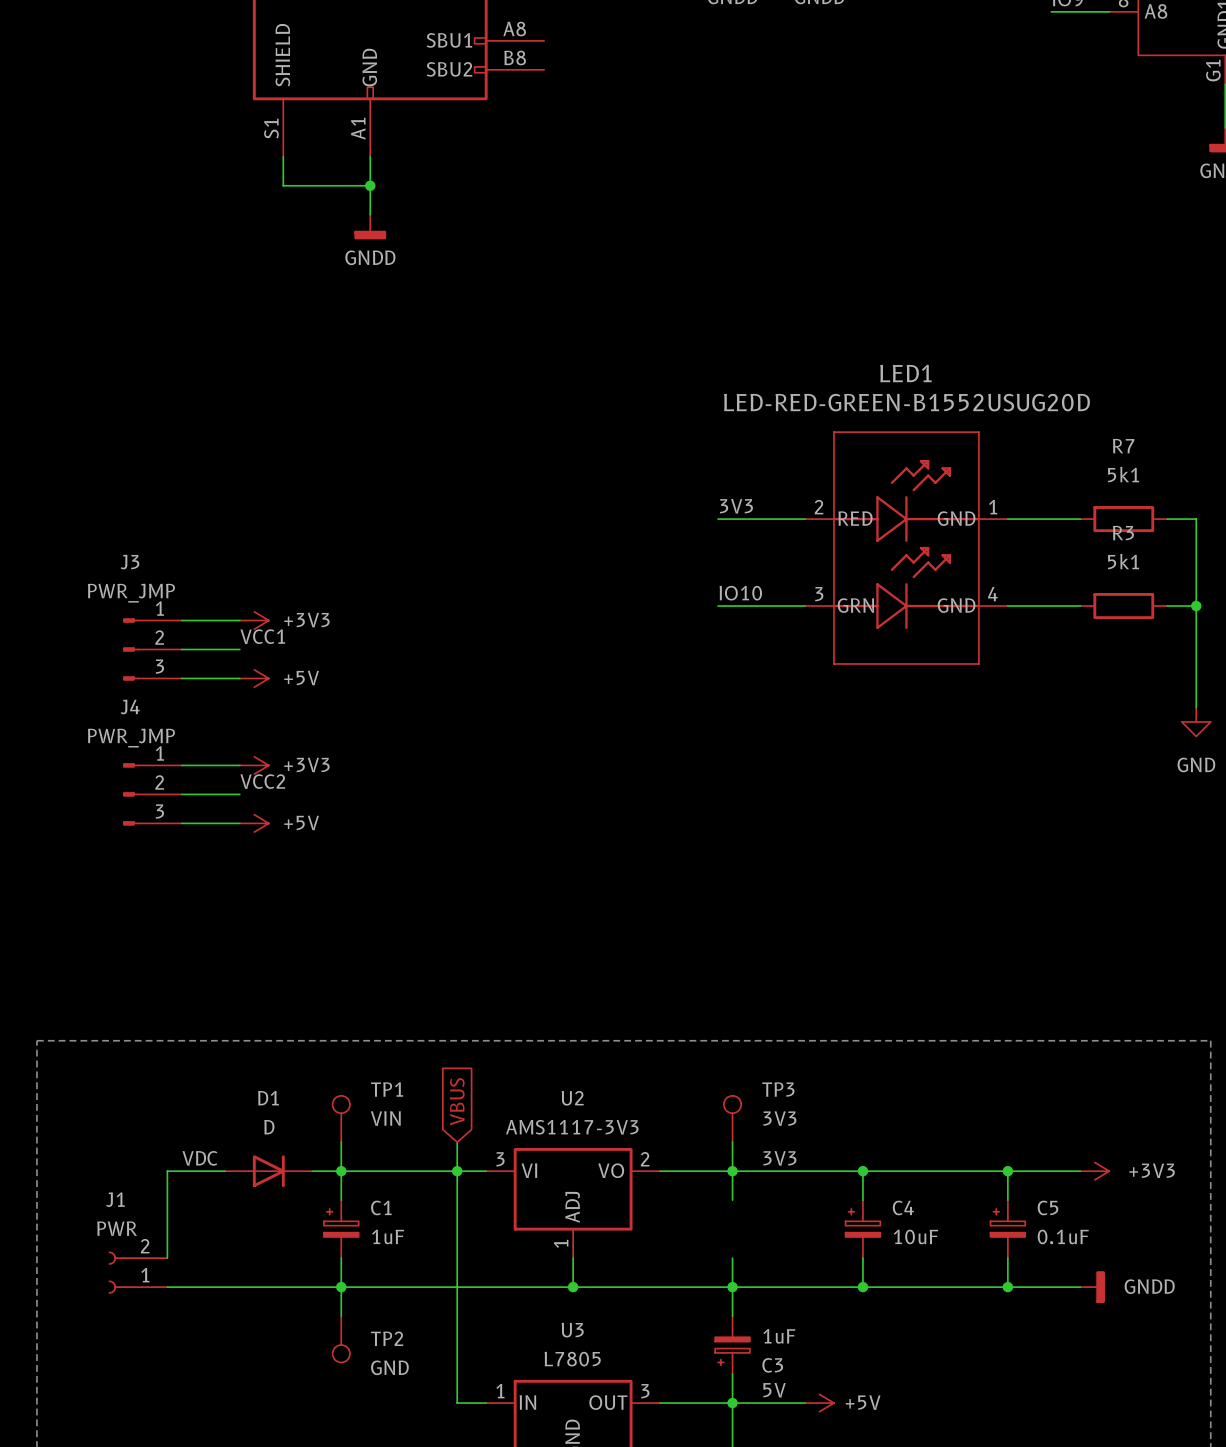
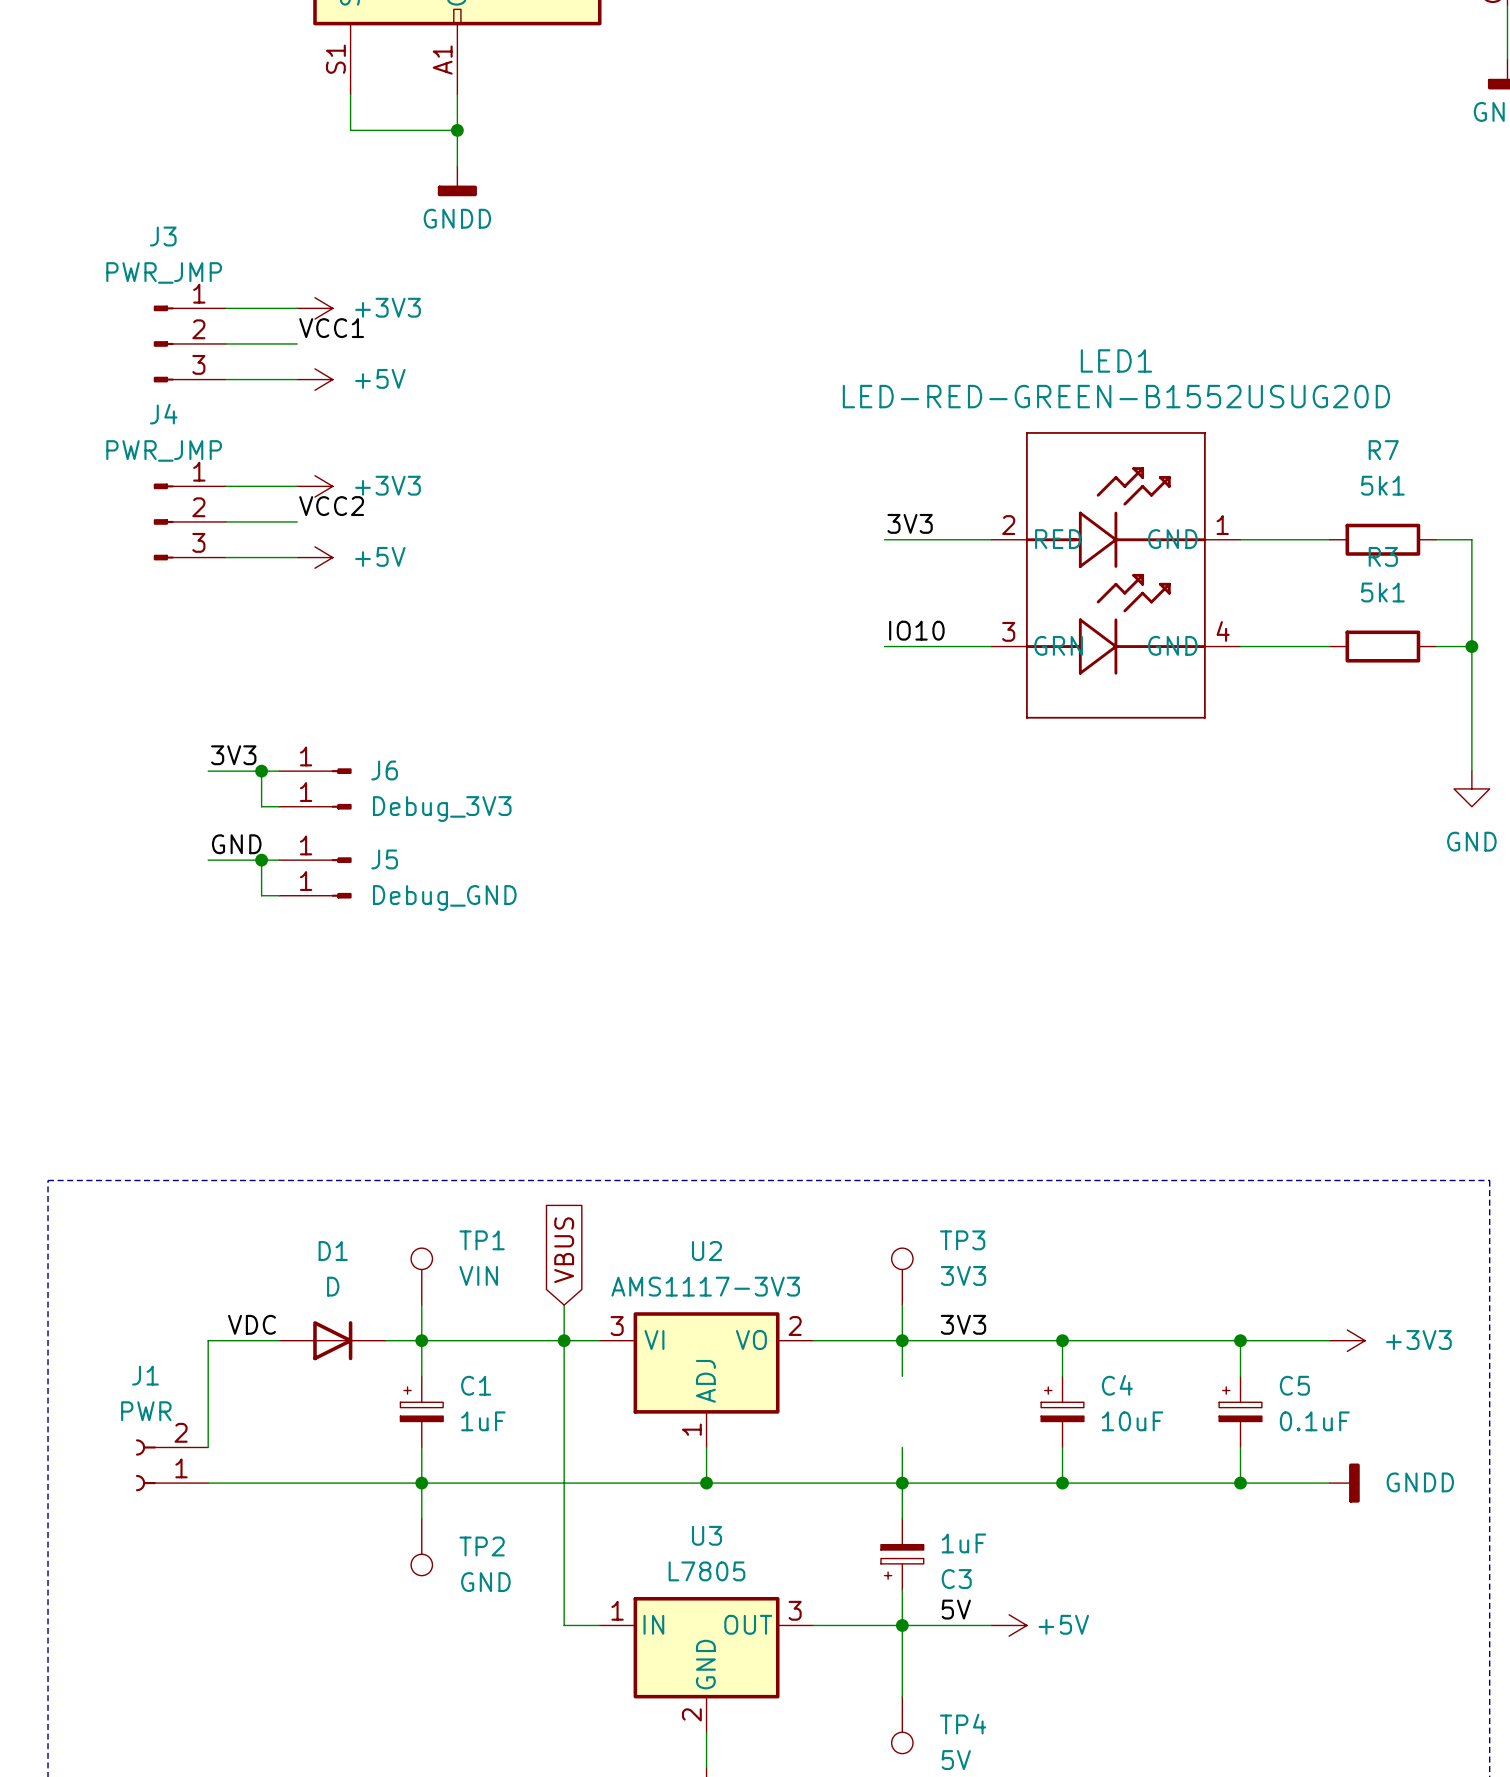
wire: none -> (225, 308) (297, 308)
power symbol: none -> +3V3 (314, 308)
label: none -> VCC1 (331, 328)
power symbol: none -> +5V (314, 379)
wire: none -> (225, 486) (297, 486)
power symbol: none -> +3V3 (314, 486)
label: none -> VCC2 (331, 506)
power symbol: none -> +5V (314, 557)
wire: (181, 620) (239, 620) -> (225, 343) (297, 343)
power symbol: +3V3 (254, 620) -> none
label: VCC1 (262, 636) -> none
J3 position: (152, 649) -> (189, 343)
wire: (181, 649) (239, 649) -> (225, 379) (297, 379)
wire: (181, 678) (239, 678) -> (208, 771) (279, 771)
power symbol: +5V (254, 678) -> none
label: none -> 3V3 (233, 755)
wire: none -> (261, 771) (261, 806) (279, 806)
junction: none -> (261, 771)
J6: none -> Debug_3V3 (315, 788)
wire: (181, 765) (239, 765) -> (225, 521) (297, 521)
power symbol: +3V3 (254, 765) -> none
label: none -> GND (236, 844)
wire: none -> (261, 860) (261, 895) (279, 895)
junction: none -> (261, 860)
label: VCC2 (262, 781) -> none
J4 position: (152, 794) -> (189, 521)
wire: (181, 794) (239, 794) -> (225, 557) (297, 557)
J5: none -> Debug_GND (315, 877)
wire: (181, 823) (239, 823) -> (208, 860) (279, 860)
power symbol: +5V (254, 823) -> none

